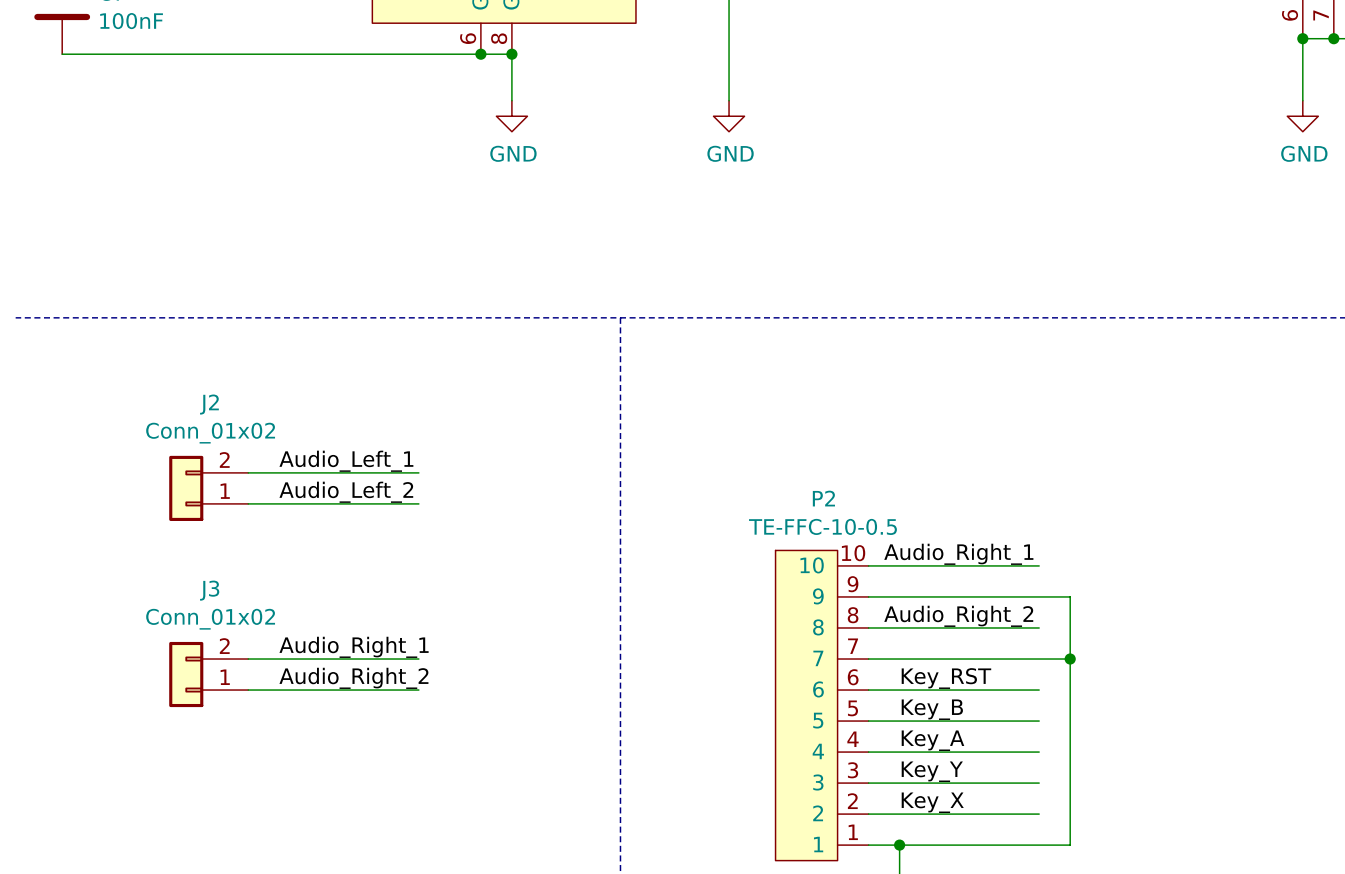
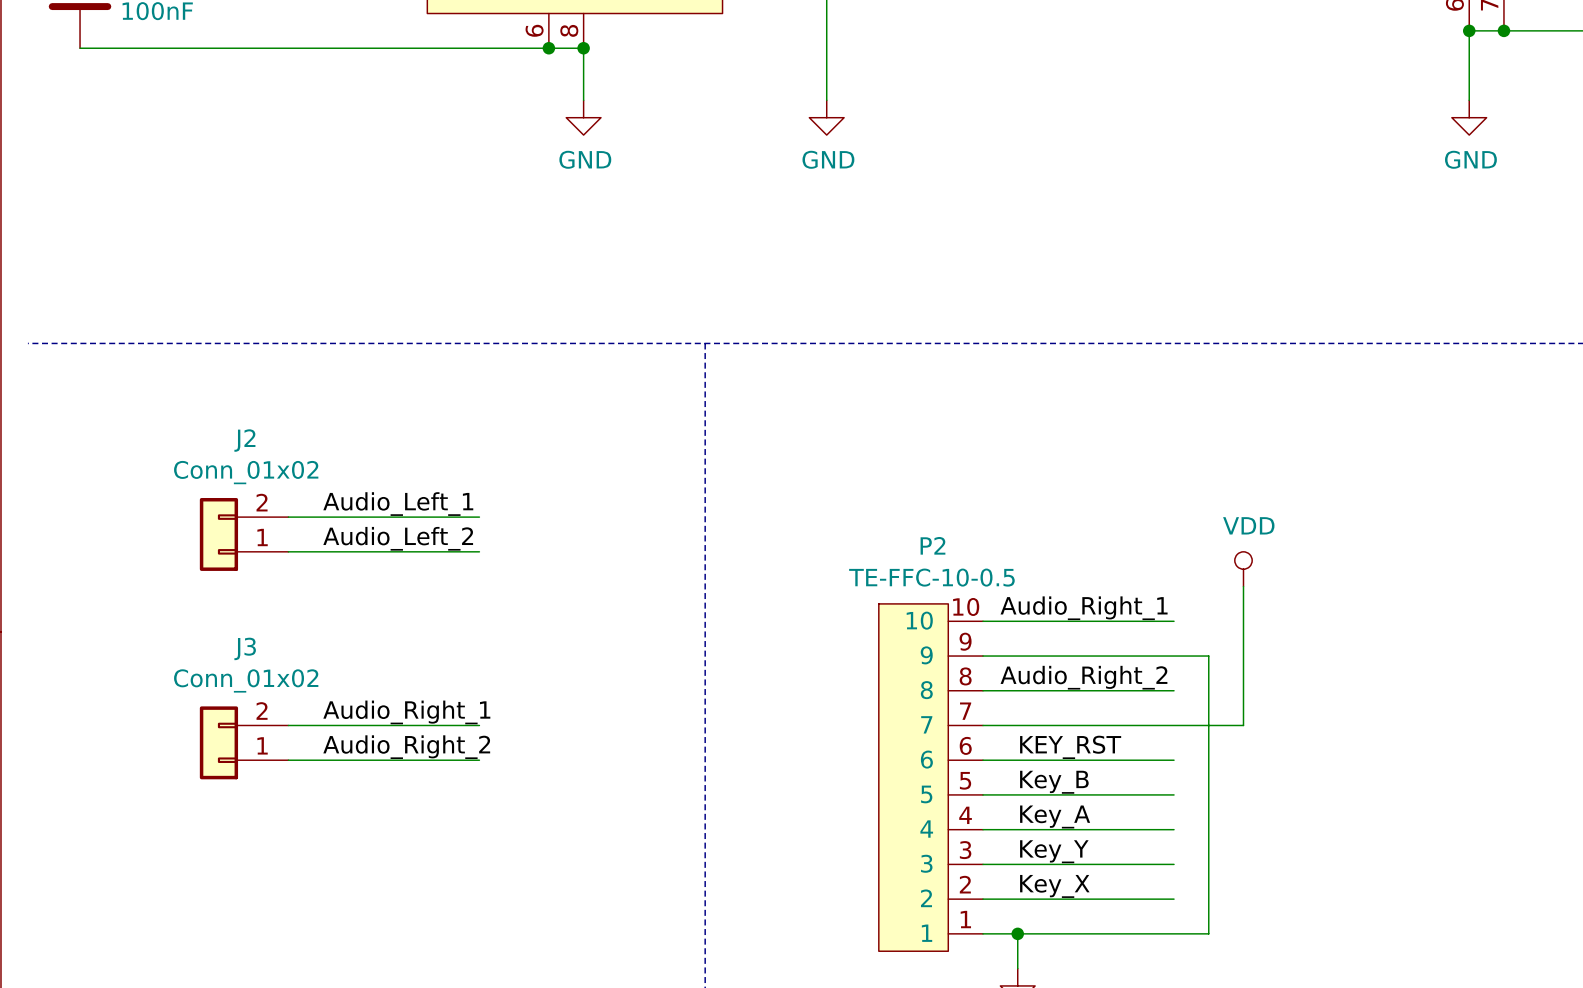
power symbol: none -> VDD (1243, 569)
wire: none -> (1243, 586) (1243, 725) (1208, 725)
junction: (1070, 659) -> none
label: Key_RST (946, 678) -> KEY_RST (1070, 747)

